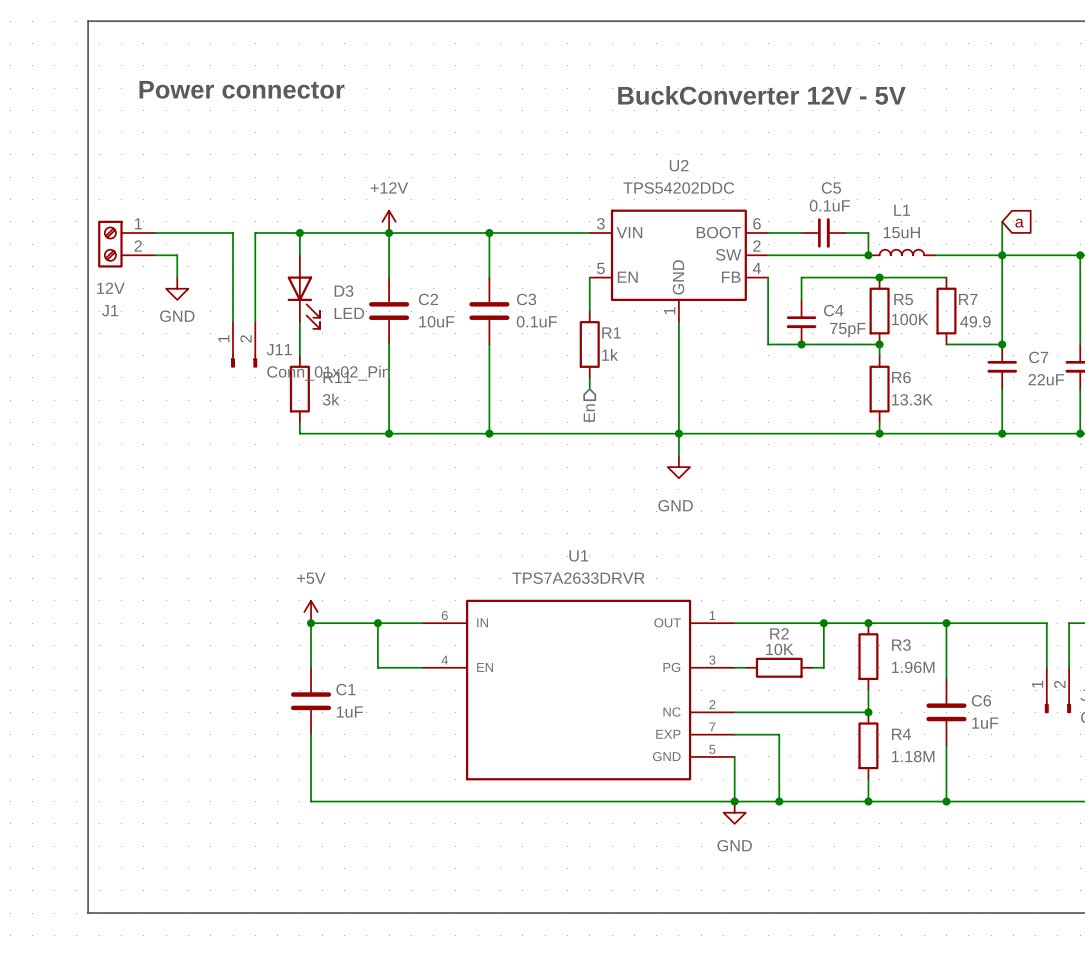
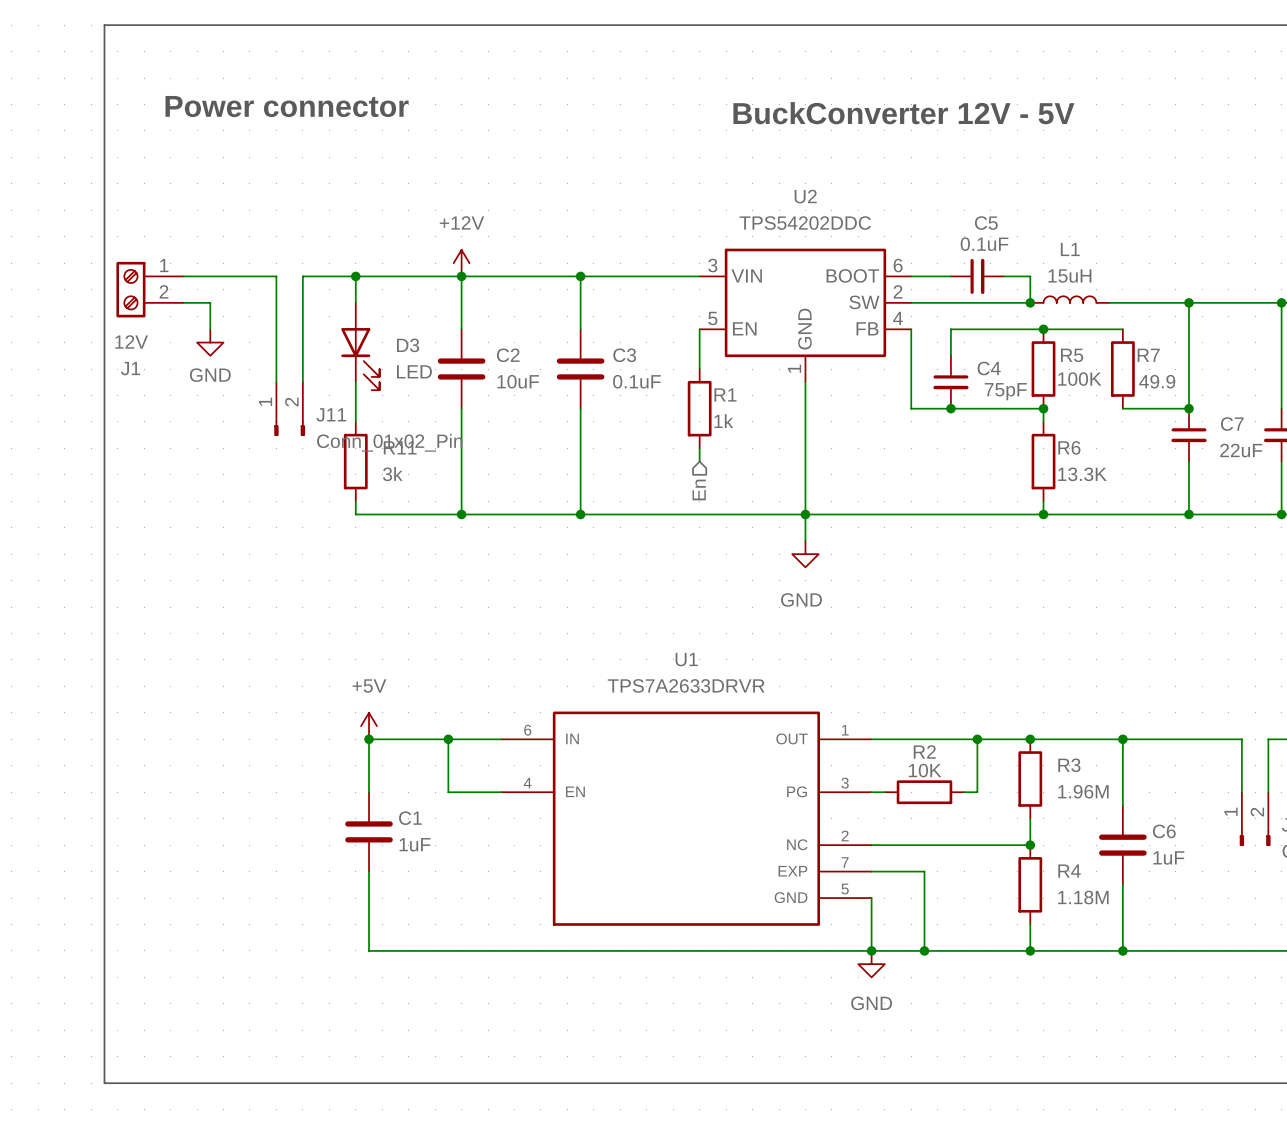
wire: (1002, 221) (1002, 255) -> none
global label: a (1019, 223) -> none

